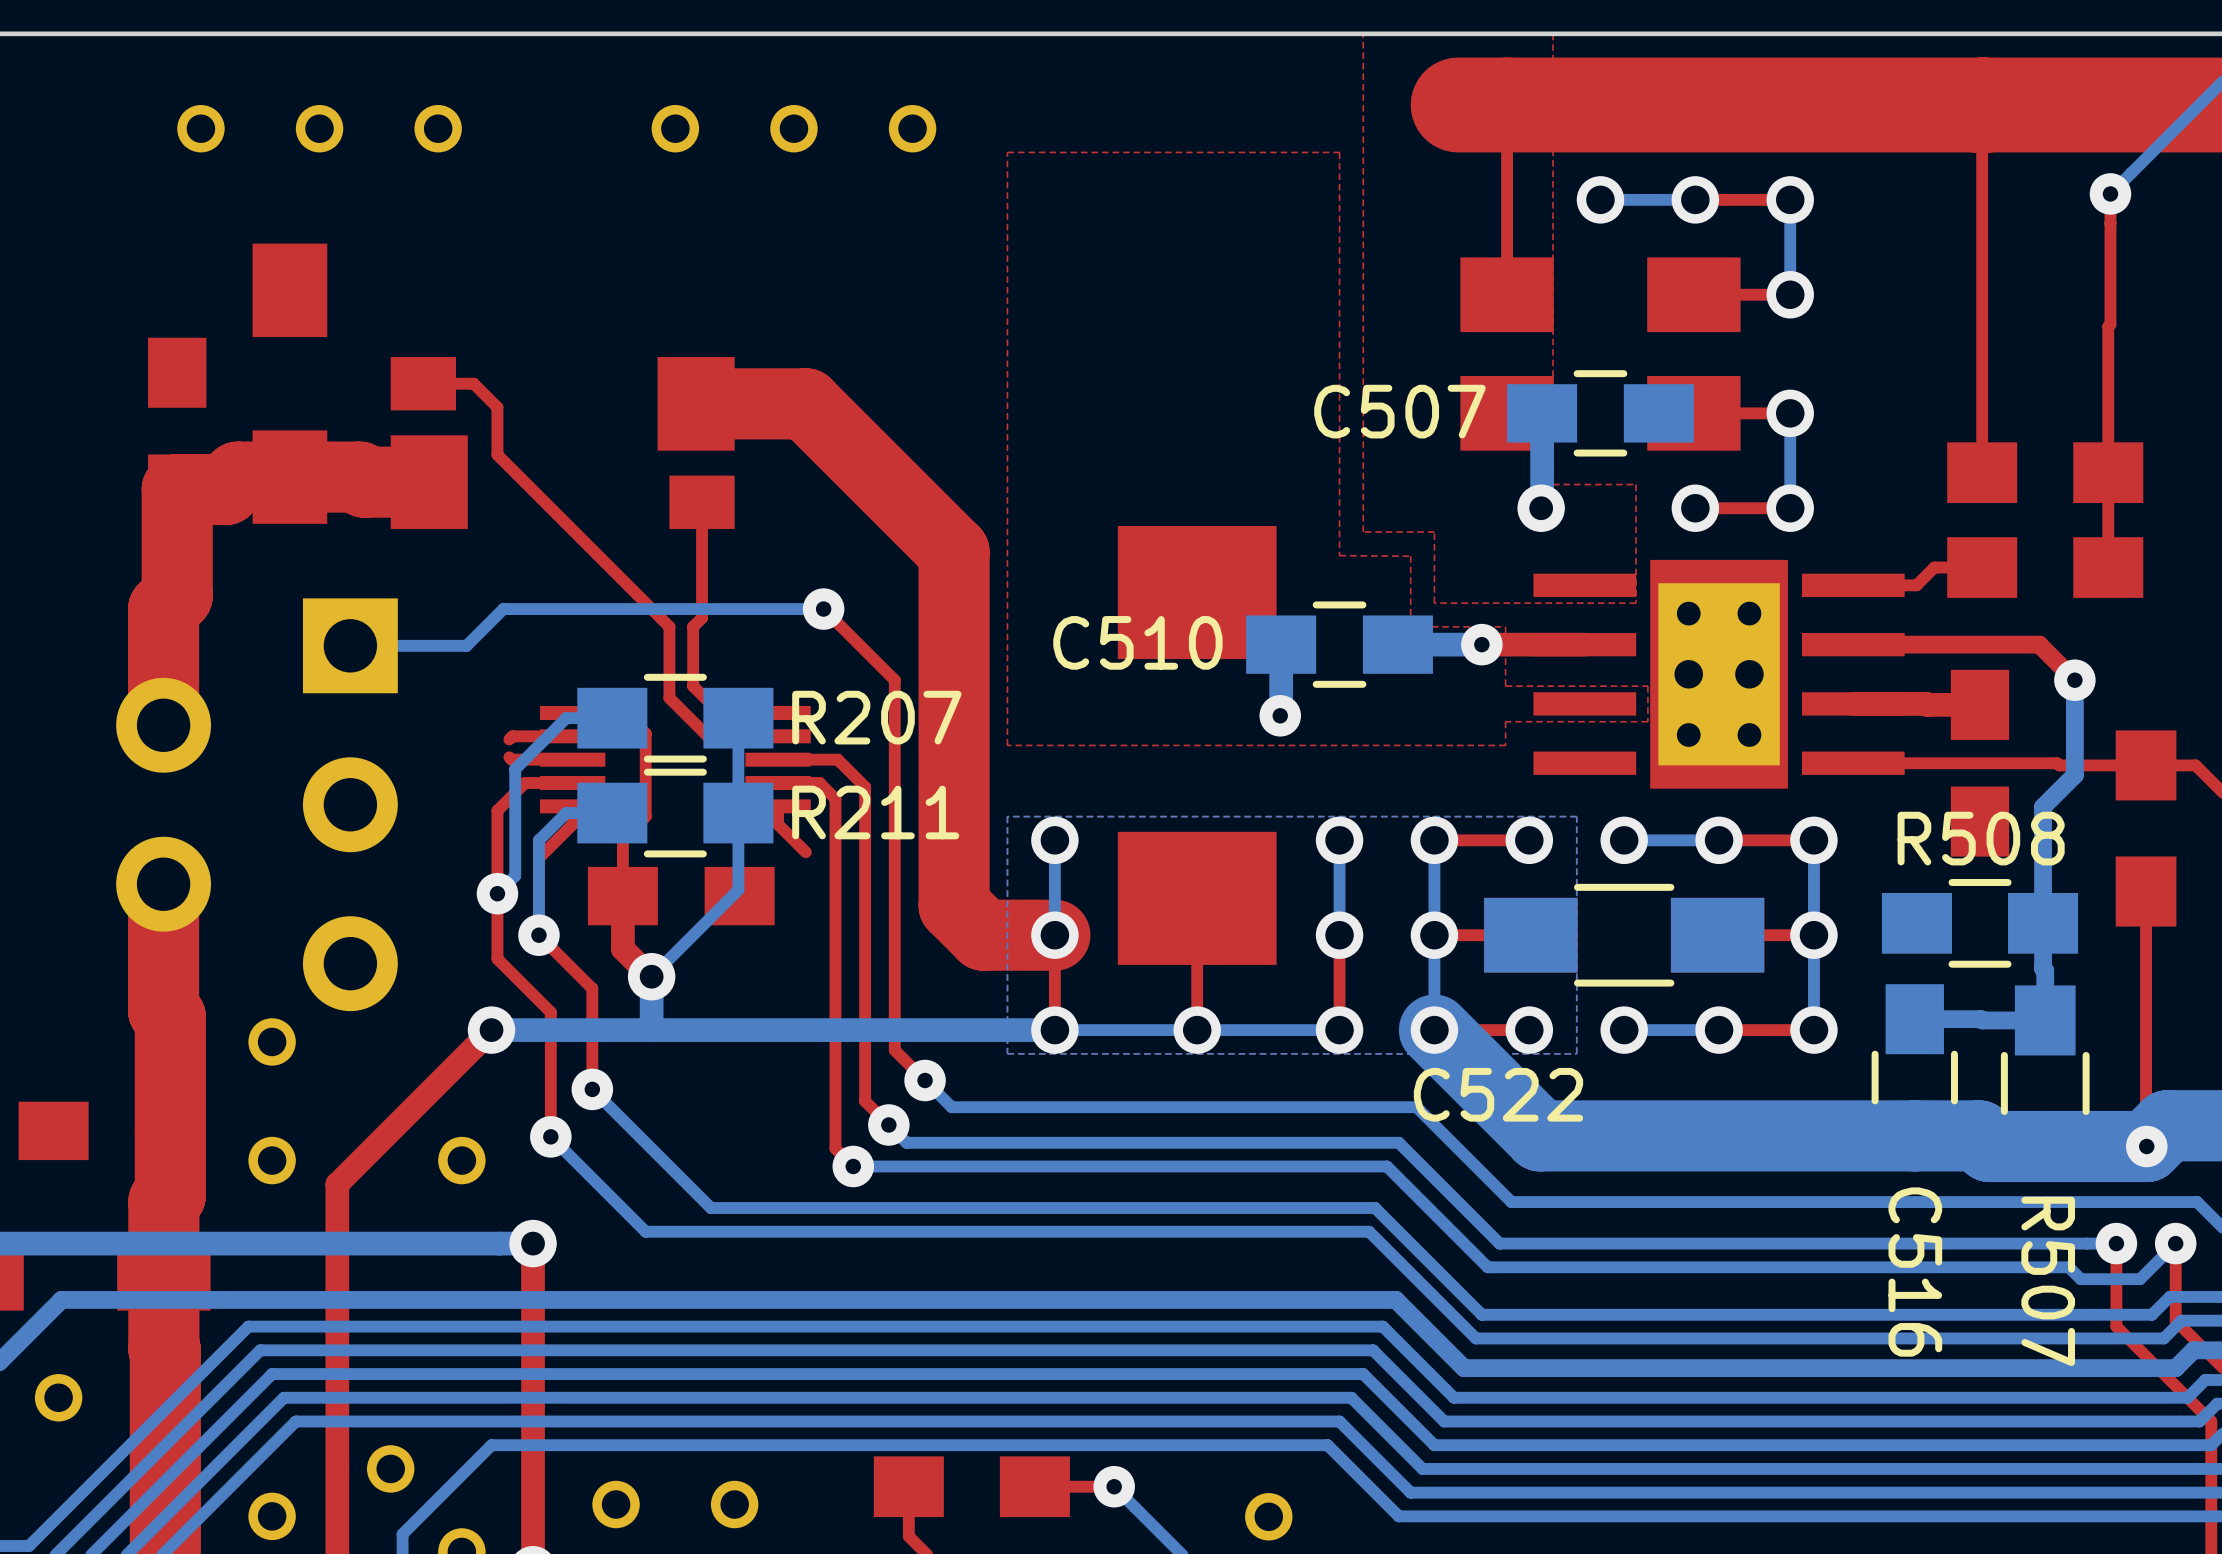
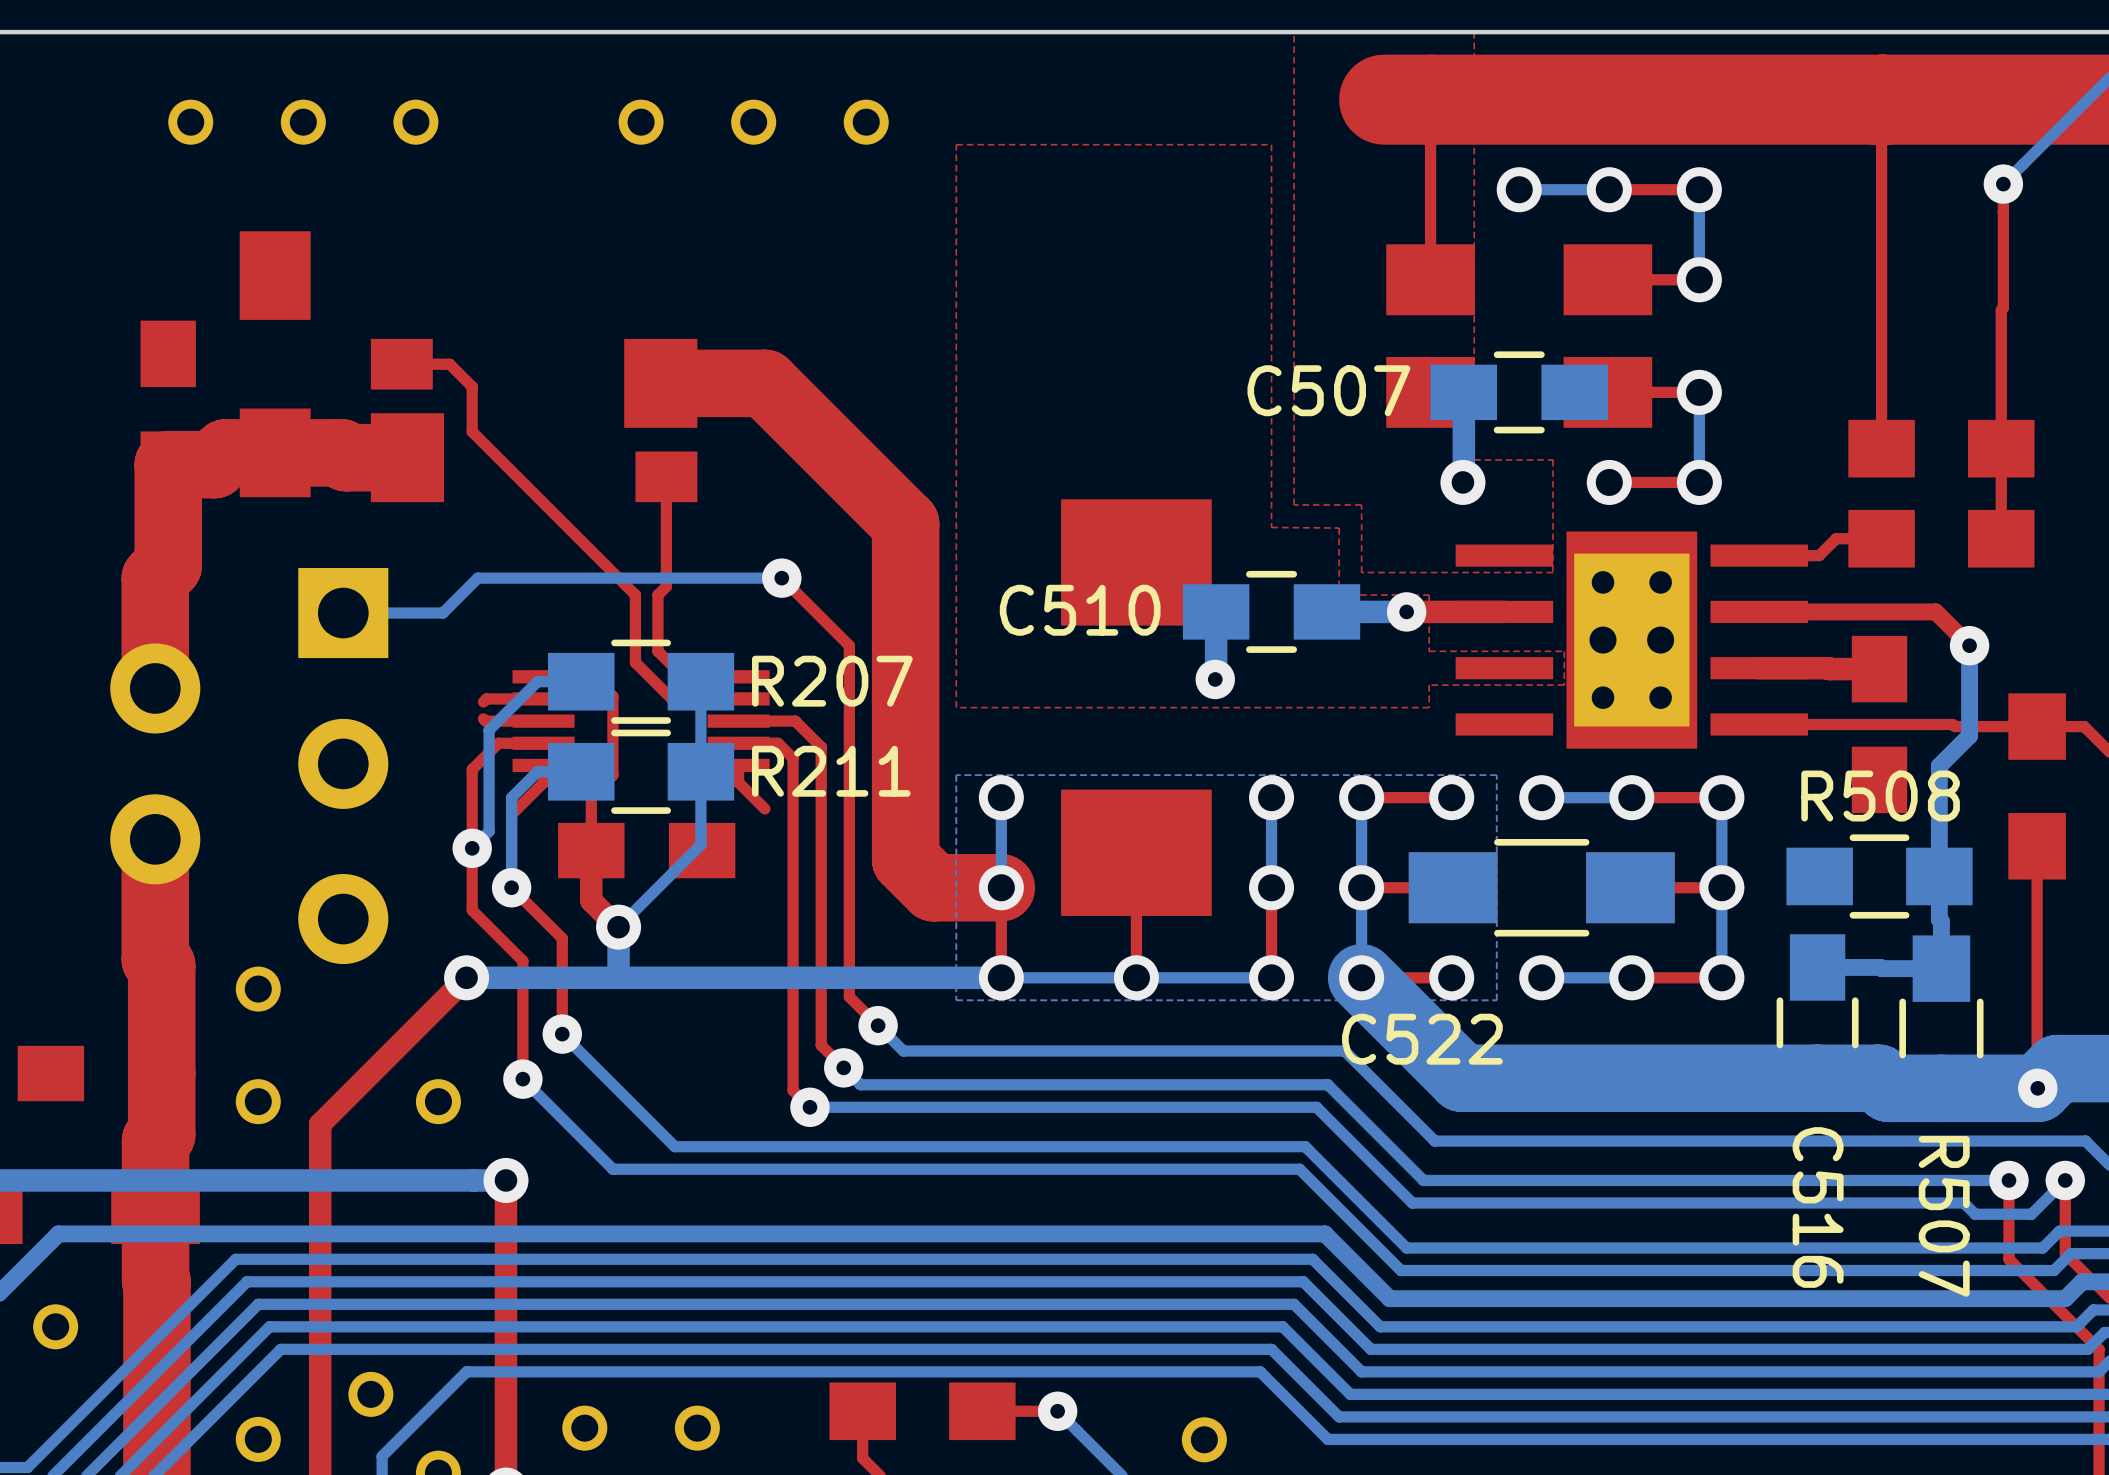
part footprint: [116, 598, 398, 1012] -> [110, 568, 389, 965]

